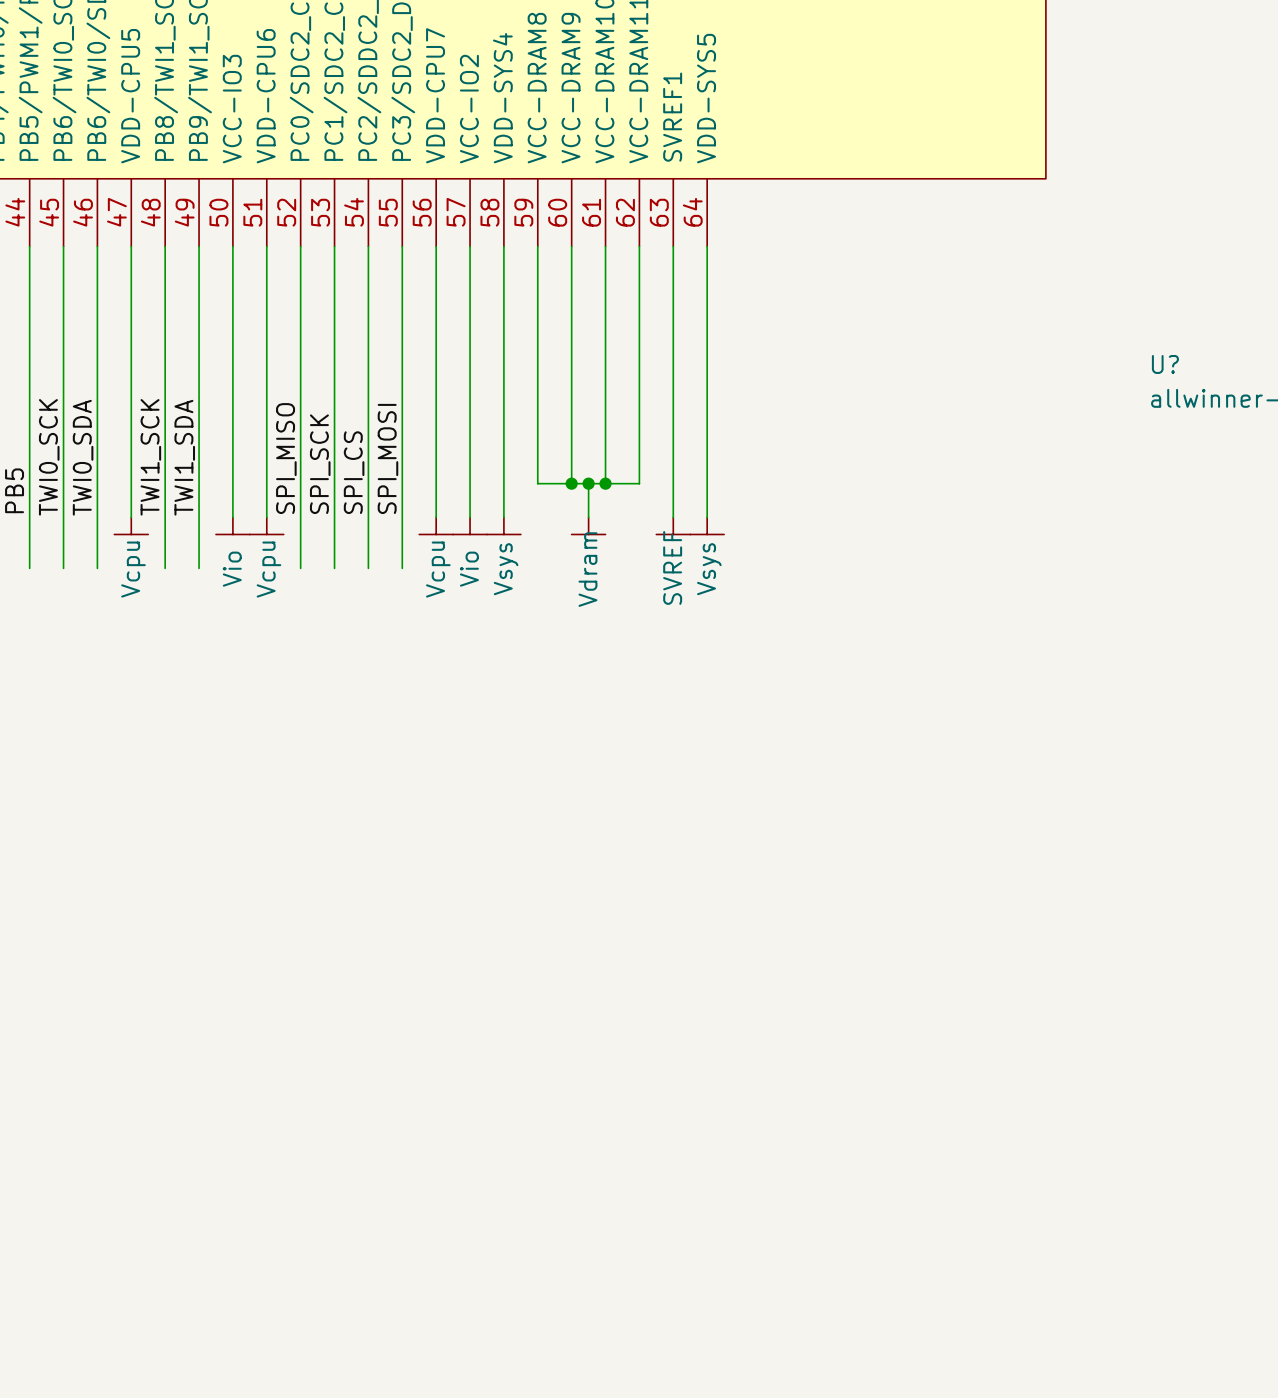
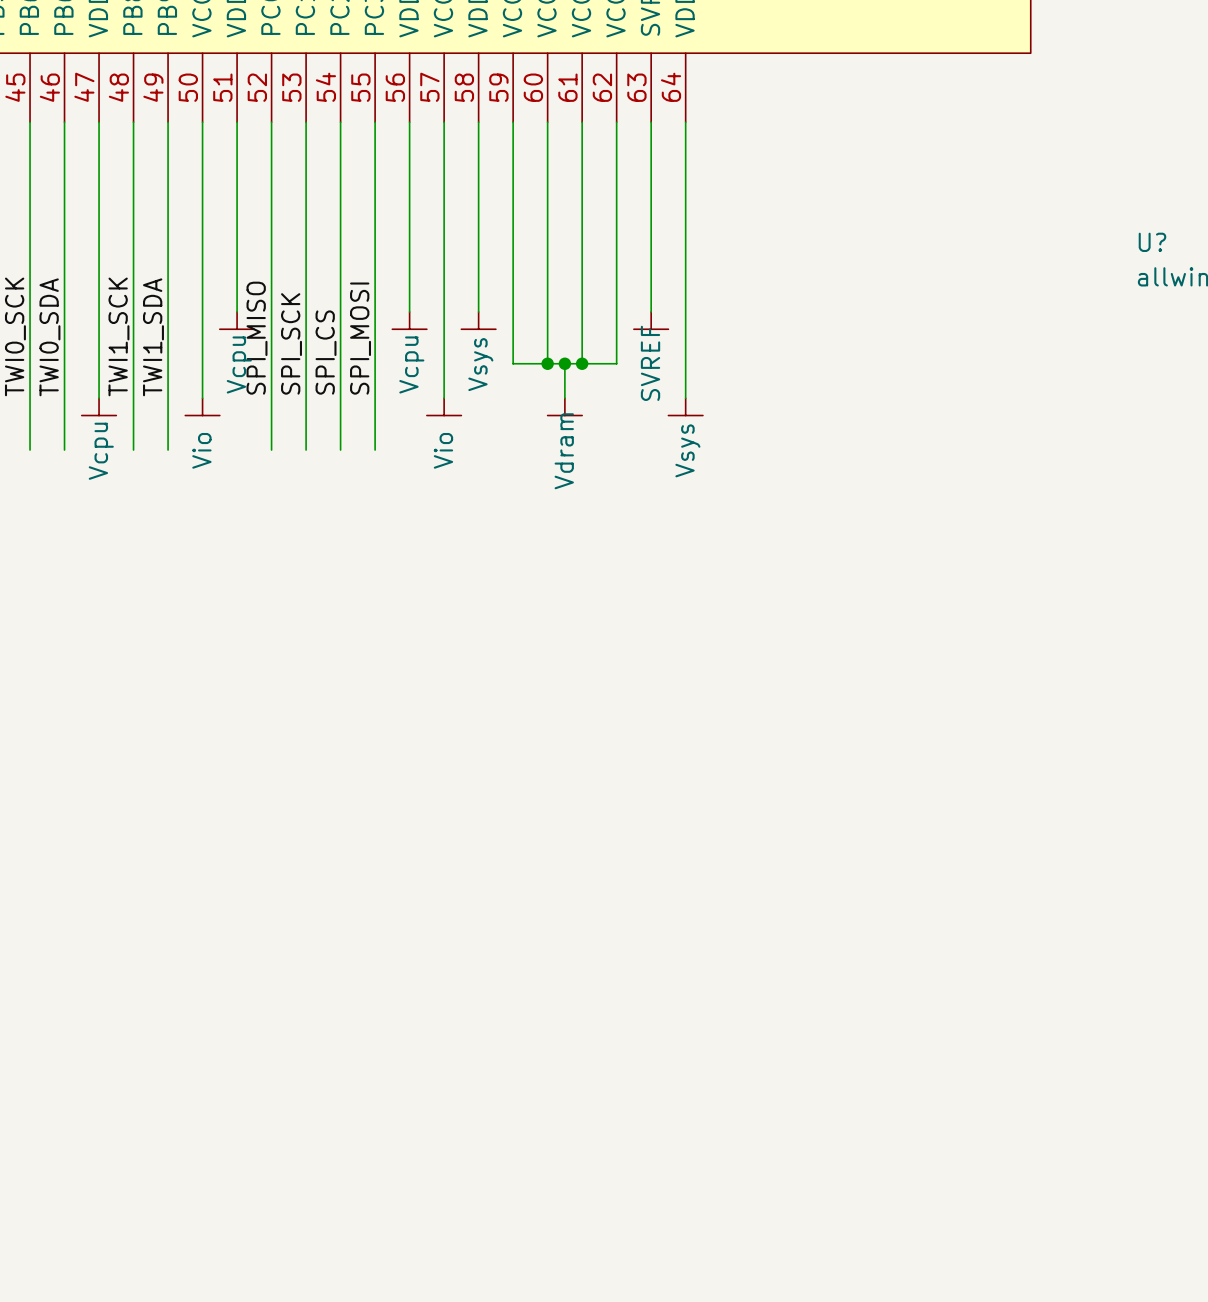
wire: (266, 432) (266, 517) -> none
wire: (436, 432) (436, 517) -> none
wire: (503, 432) (503, 517) -> none
wire: (673, 432) (673, 517) -> none
power symbol position: Vcpu (266, 526) -> Vcpu (237, 320)
power symbol position: Vcpu (436, 526) -> Vcpu (409, 320)
power symbol position: Vsys (503, 526) -> Vsys (478, 320)
power symbol position: SVREF (673, 526) -> SVREF (651, 320)

